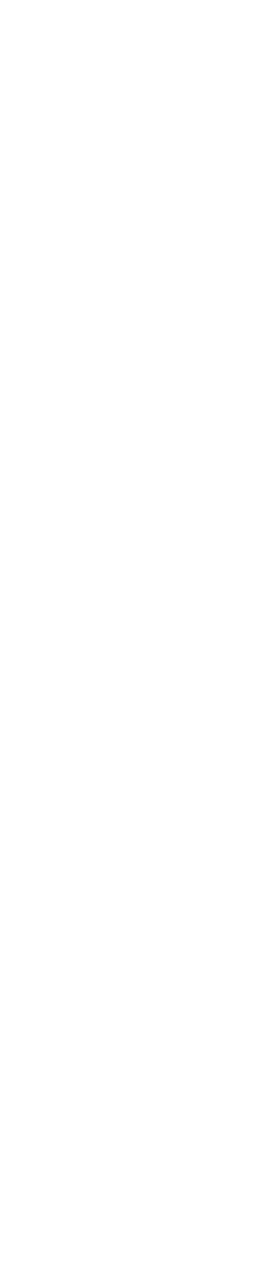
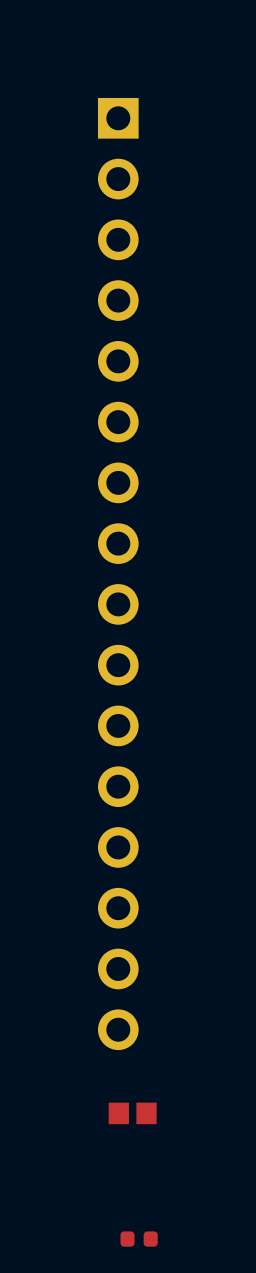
part: none -> (118, 574)
part: none -> (132, 1113)
part: none -> (139, 1239)

